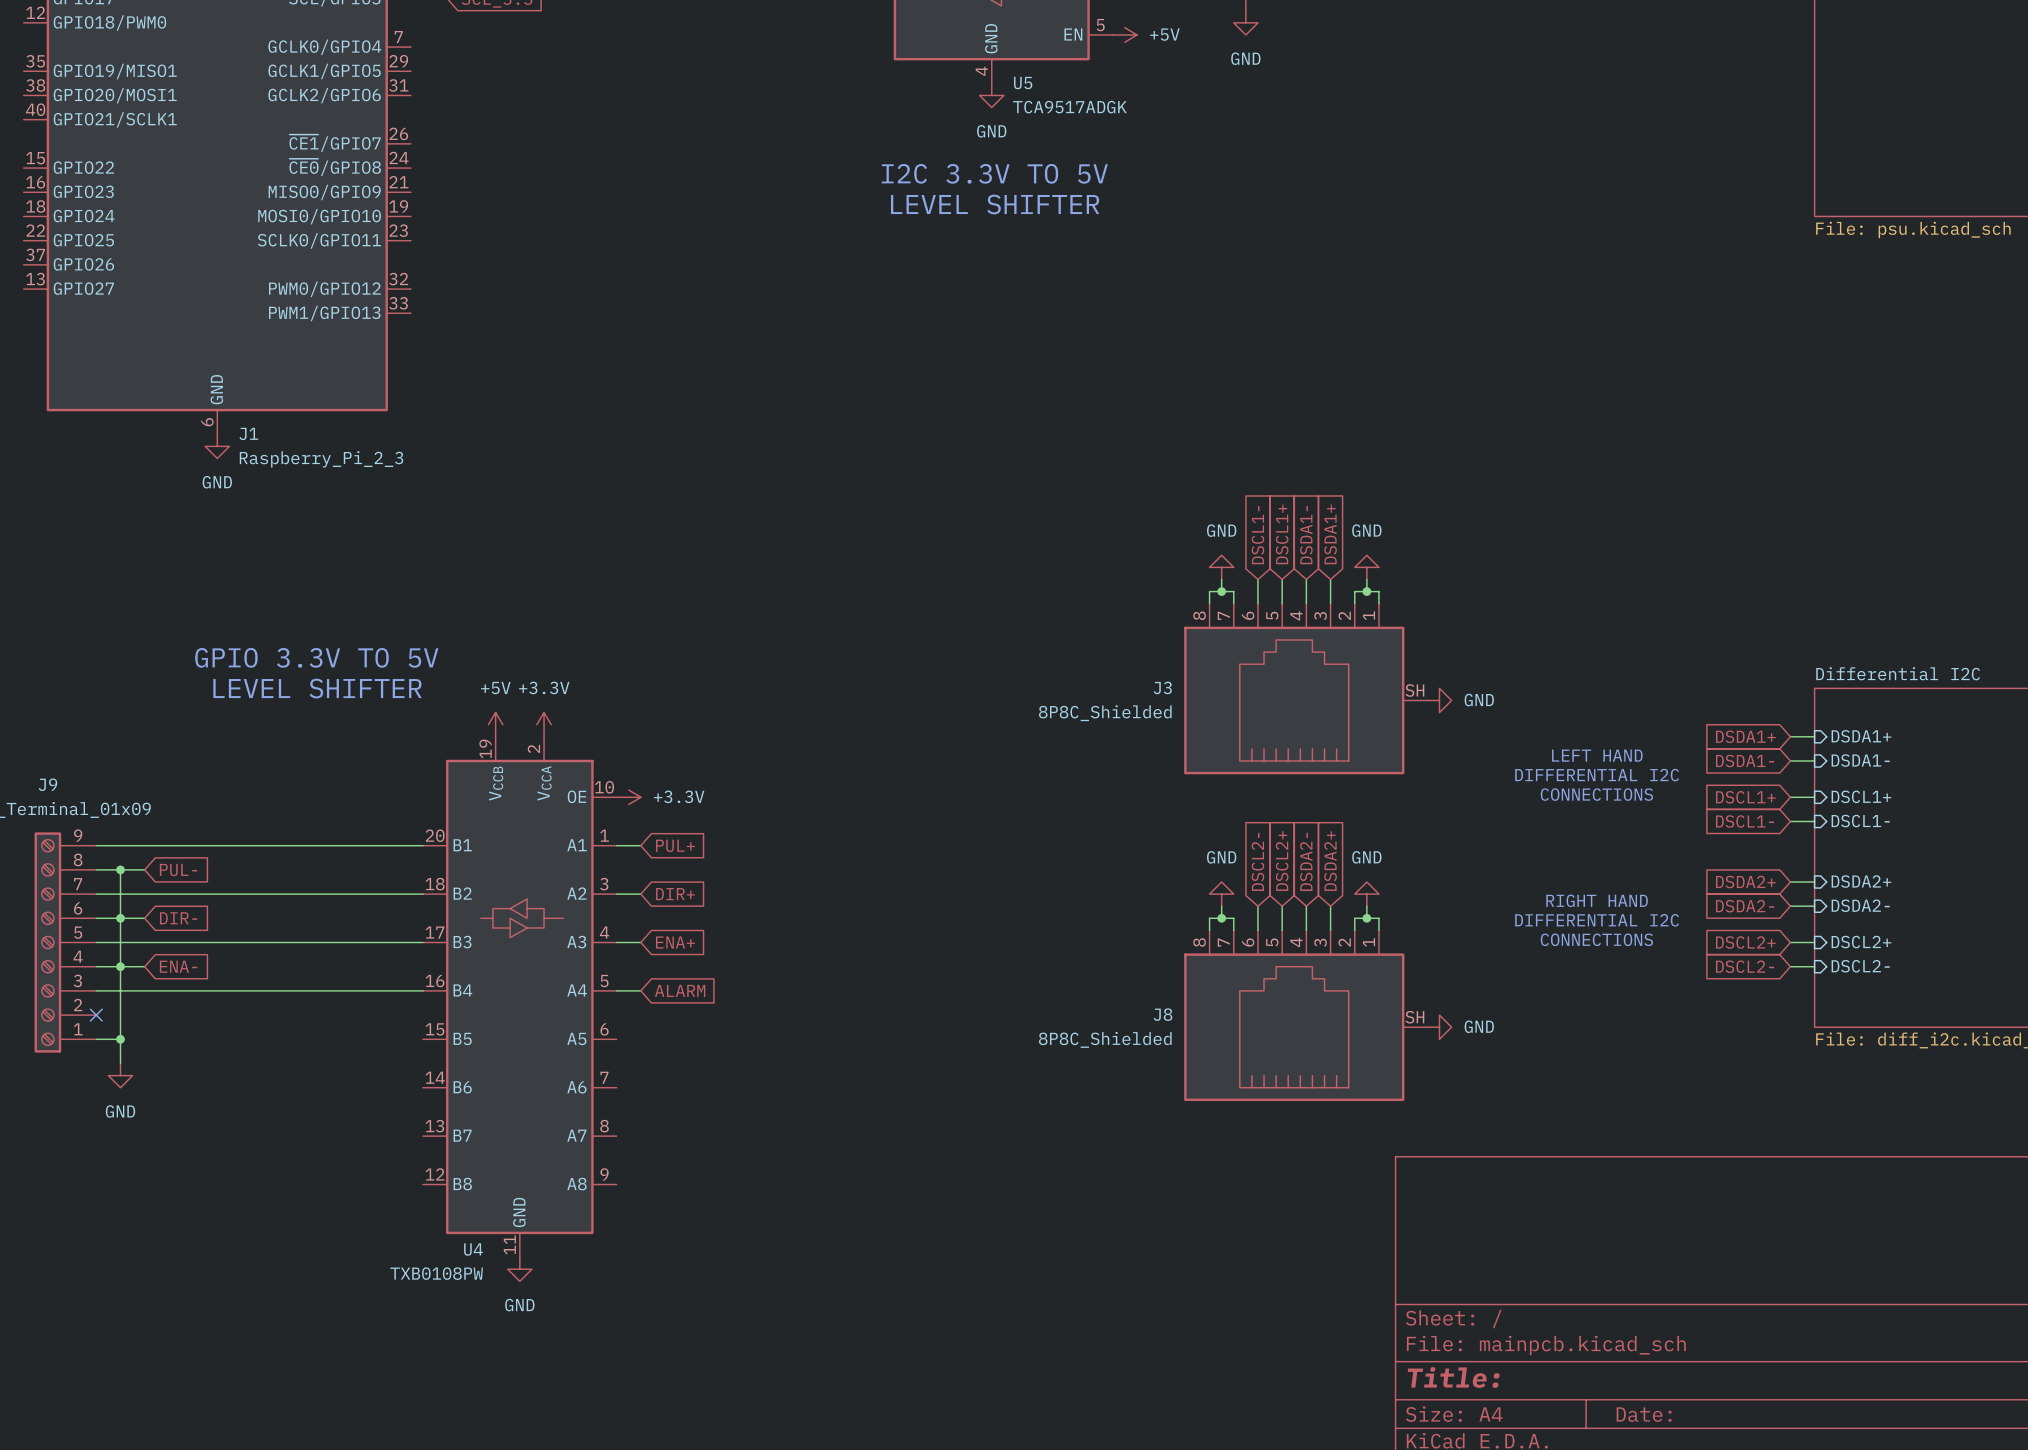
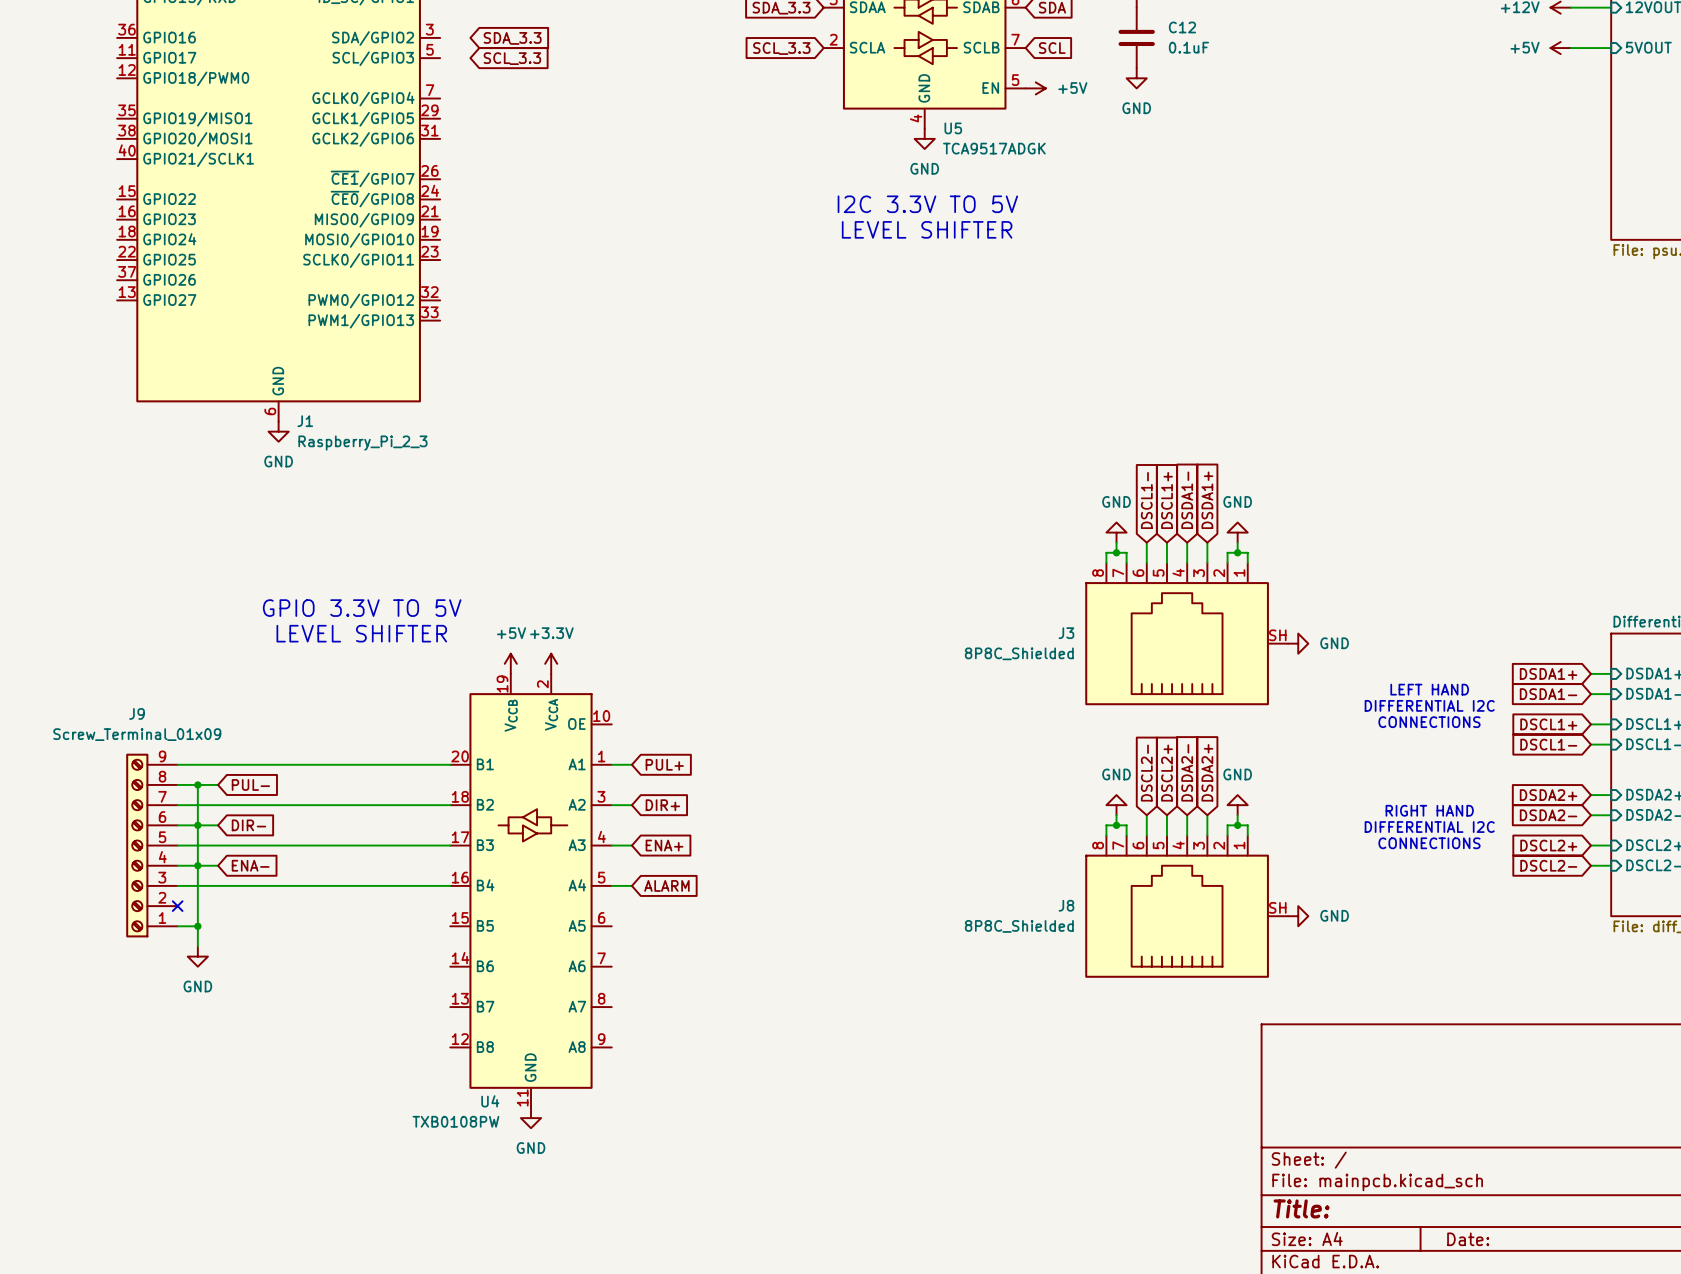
power symbol: +3.3V (628, 797) -> none

